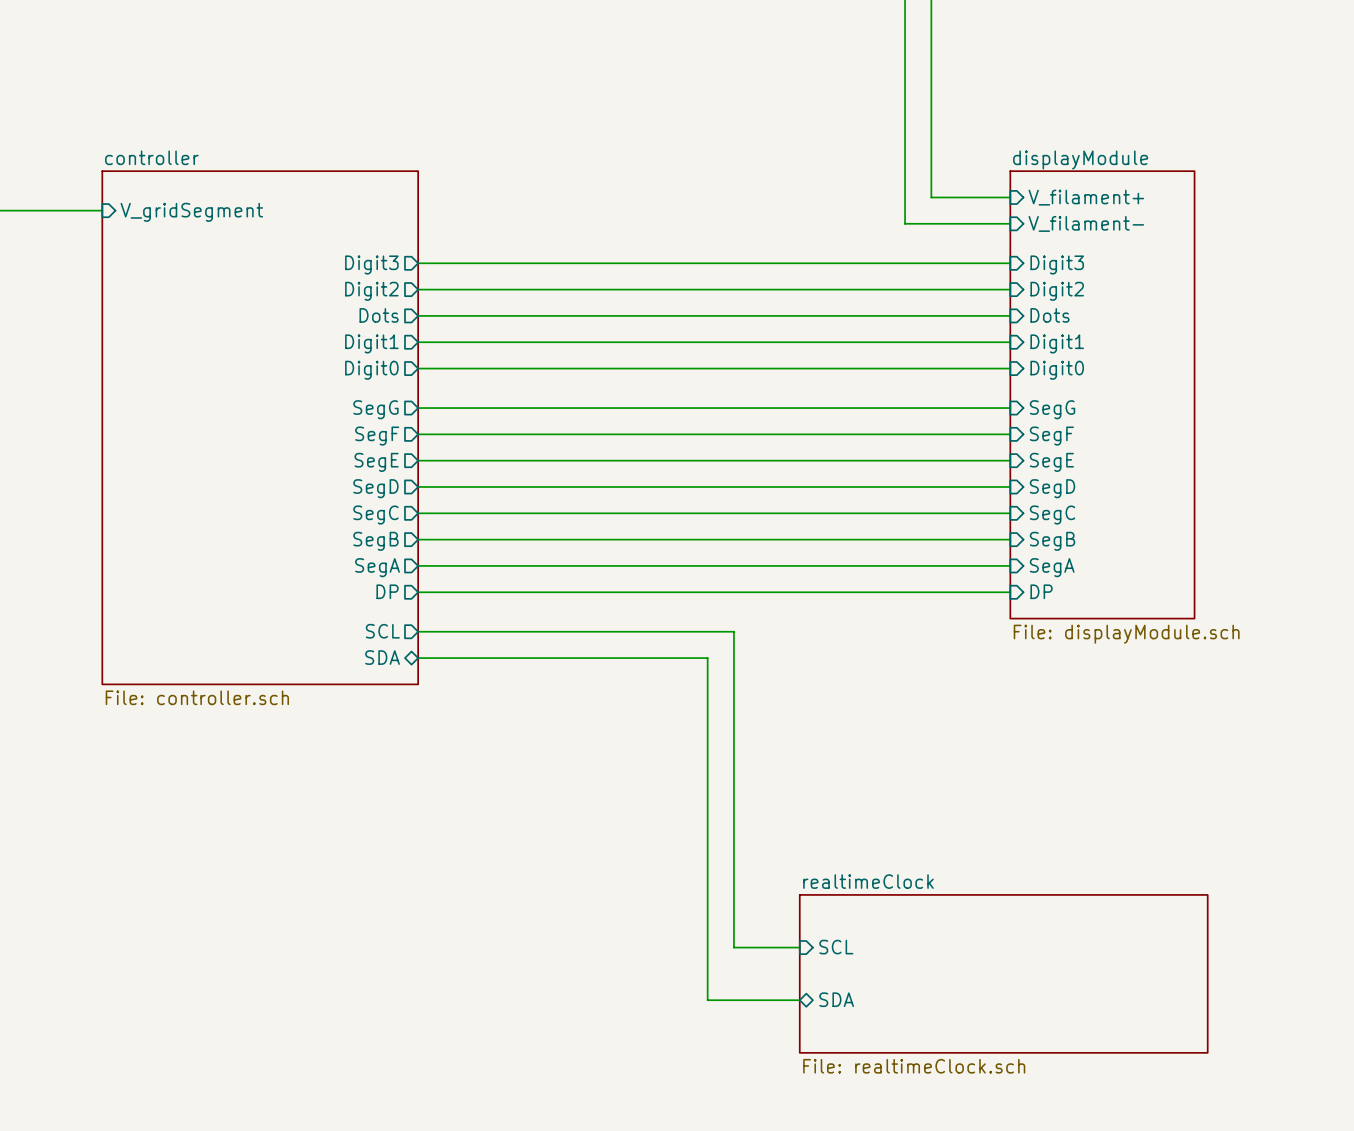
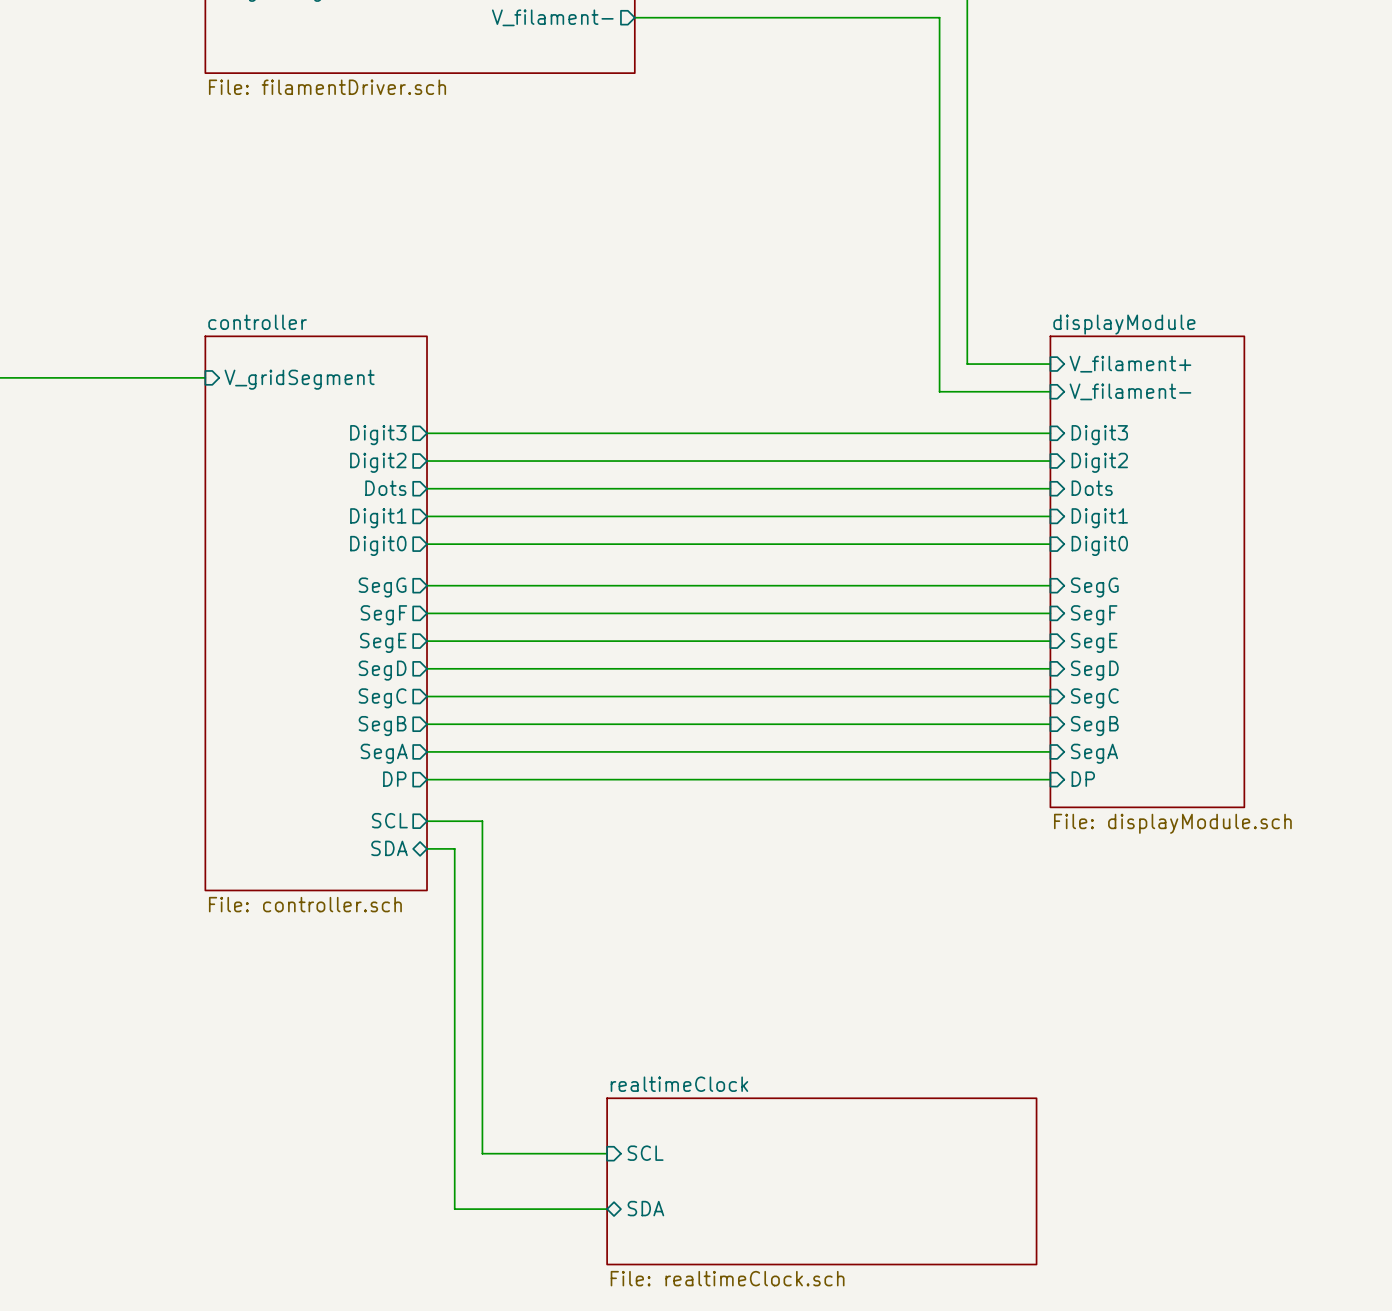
wire: none -> (94, 377) (205, 377)
sheet pin position: V_gridSegment (191, 212) -> V_gridSegment (299, 379)
sheet controller: File: controller.sch (260, 427) -> none
sheet controller: none -> File: controller.sch (316, 613)
wire: (470, 631) (733, 631) (733, 947) (799, 947) -> (482, 821) (482, 1153) (607, 1153)
wire: (444, 658) (707, 658) (707, 1000) (799, 1000) -> (454, 848) (454, 1209) (607, 1209)
sheet pin position: SCL (836, 947) -> SCL (645, 1153)
sheet realtimeClock position: (1003, 973) -> (821, 1181)
sheet pin position: SDA (836, 999) -> SDA (645, 1208)

